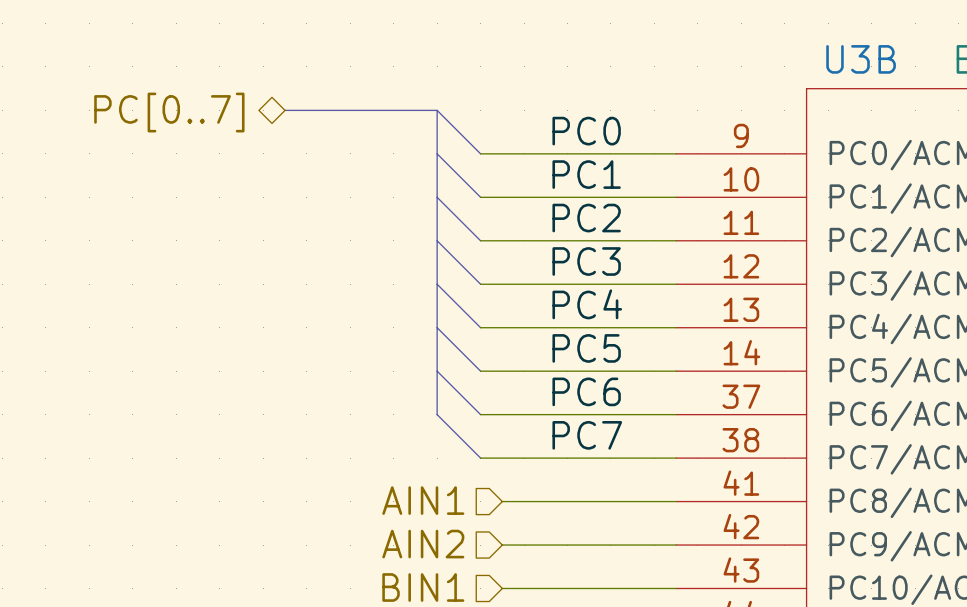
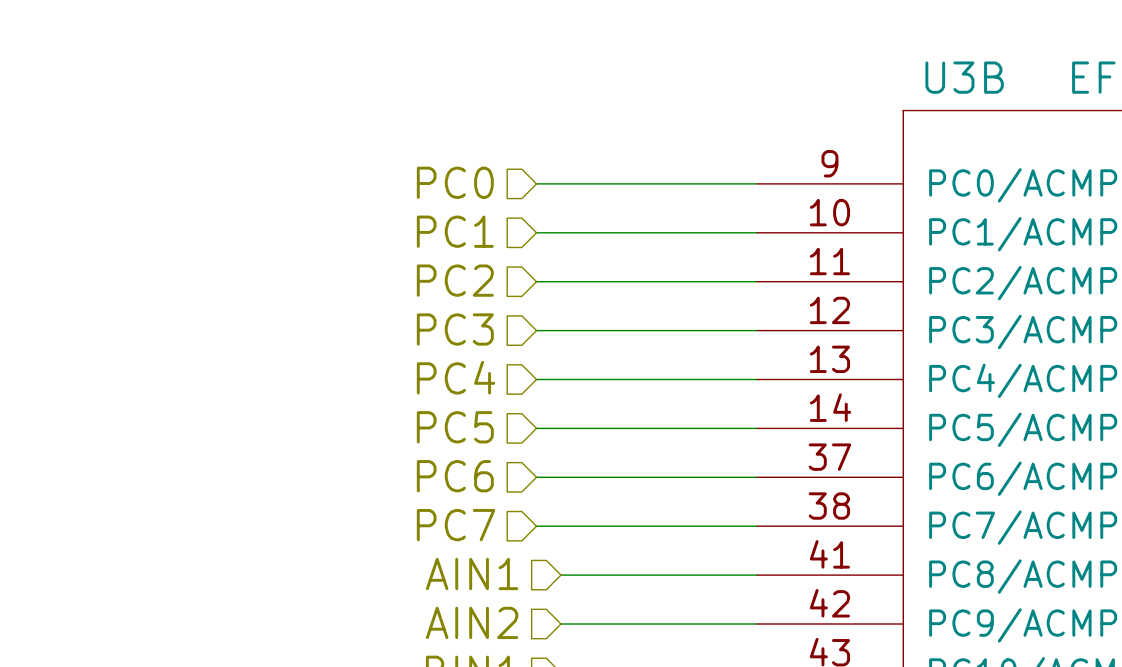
bus: (285, 110) (437, 110) -> none
bus: (437, 110) (480, 153) -> none
bus: (437, 110) (437, 414) (480, 458) -> none
hierarchical label: PC[0..7] (169, 112) -> none
label: PC0 (586, 131) -> none
hierarchical label: none -> PC0 (455, 182)
bus: (437, 153) (480, 197) -> none
label: PC1 (586, 174) -> none
hierarchical label: none -> PC1 (455, 231)
bus: (437, 197) (480, 240) -> none
label: PC2 (586, 218) -> none
hierarchical label: none -> PC2 (455, 280)
bus: (437, 240) (480, 284) -> none
label: PC3 (586, 261) -> none
hierarchical label: none -> PC3 (455, 329)
bus: (437, 284) (480, 327) -> none
label: PC4 (587, 304) -> none
hierarchical label: none -> PC4 (456, 377)
bus: (437, 327) (480, 371) -> none
label: PC5 (586, 348) -> none
hierarchical label: none -> PC5 (455, 427)
bus: (437, 371) (480, 414) -> none
label: PC6 (586, 391) -> none
hierarchical label: none -> PC6 (455, 476)
label: PC7 (587, 435) -> none
hierarchical label: none -> PC7 (456, 525)

